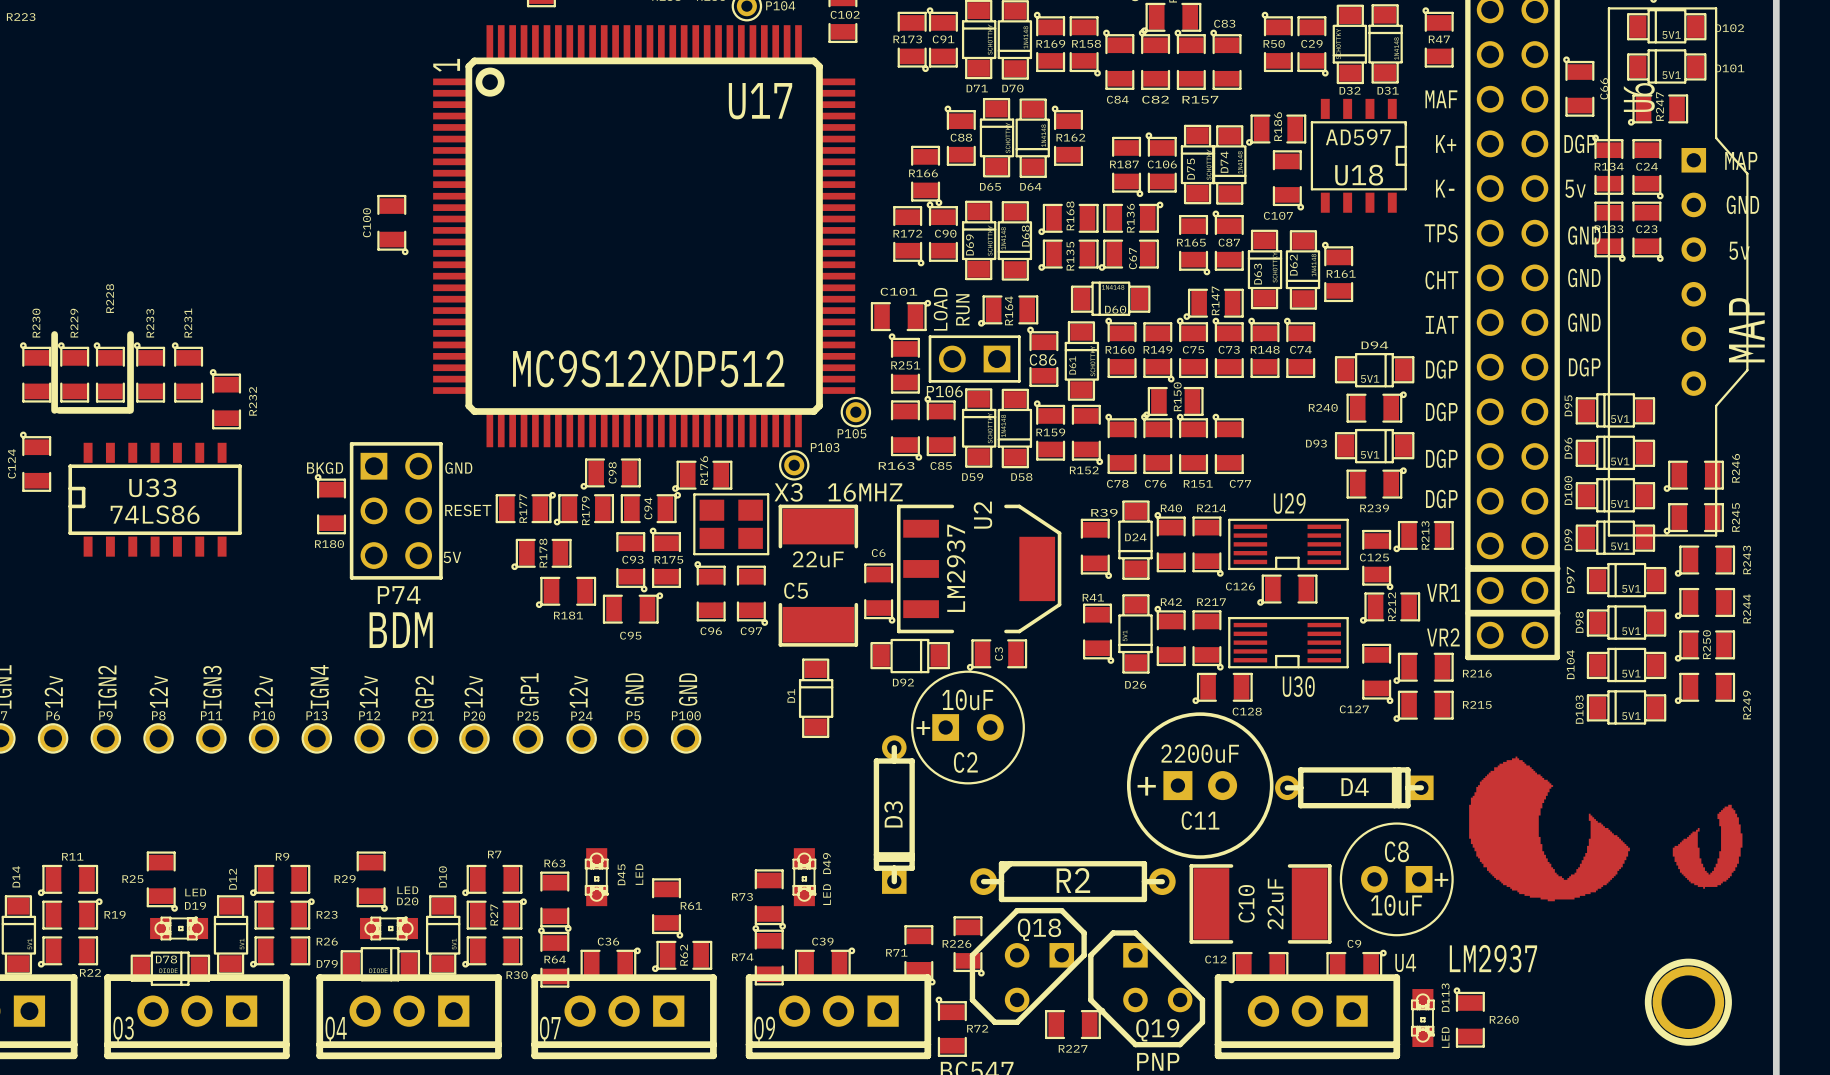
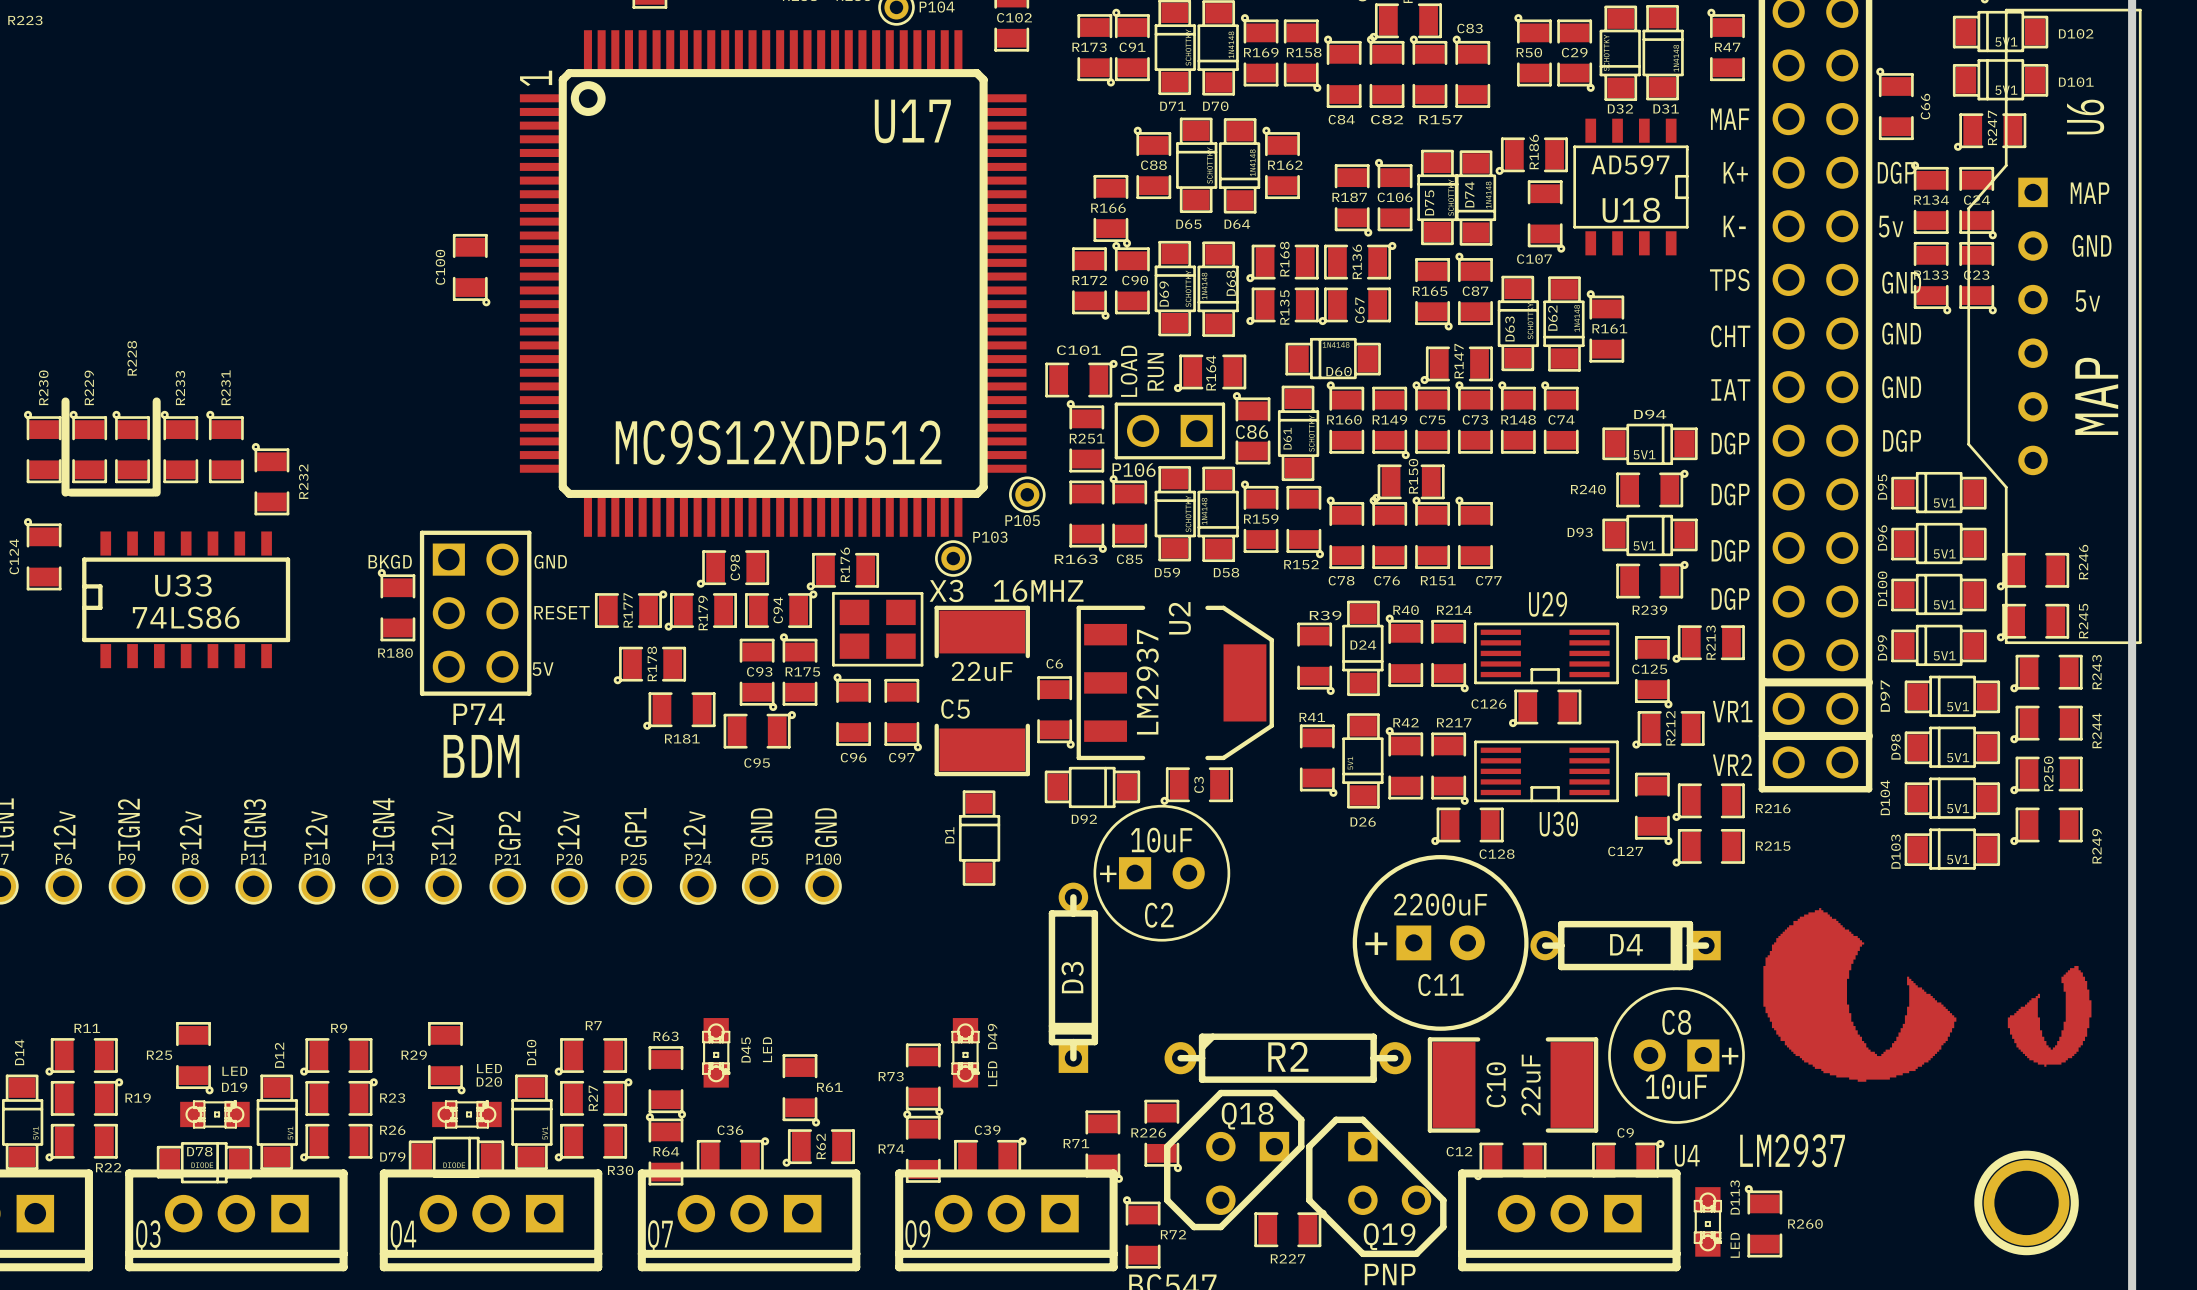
U6 footprint: [1607, 7, 1749, 537] -> [1967, 8, 2142, 645]
U6 name position: U6 (1639, 97) -> U6 (2085, 117)

